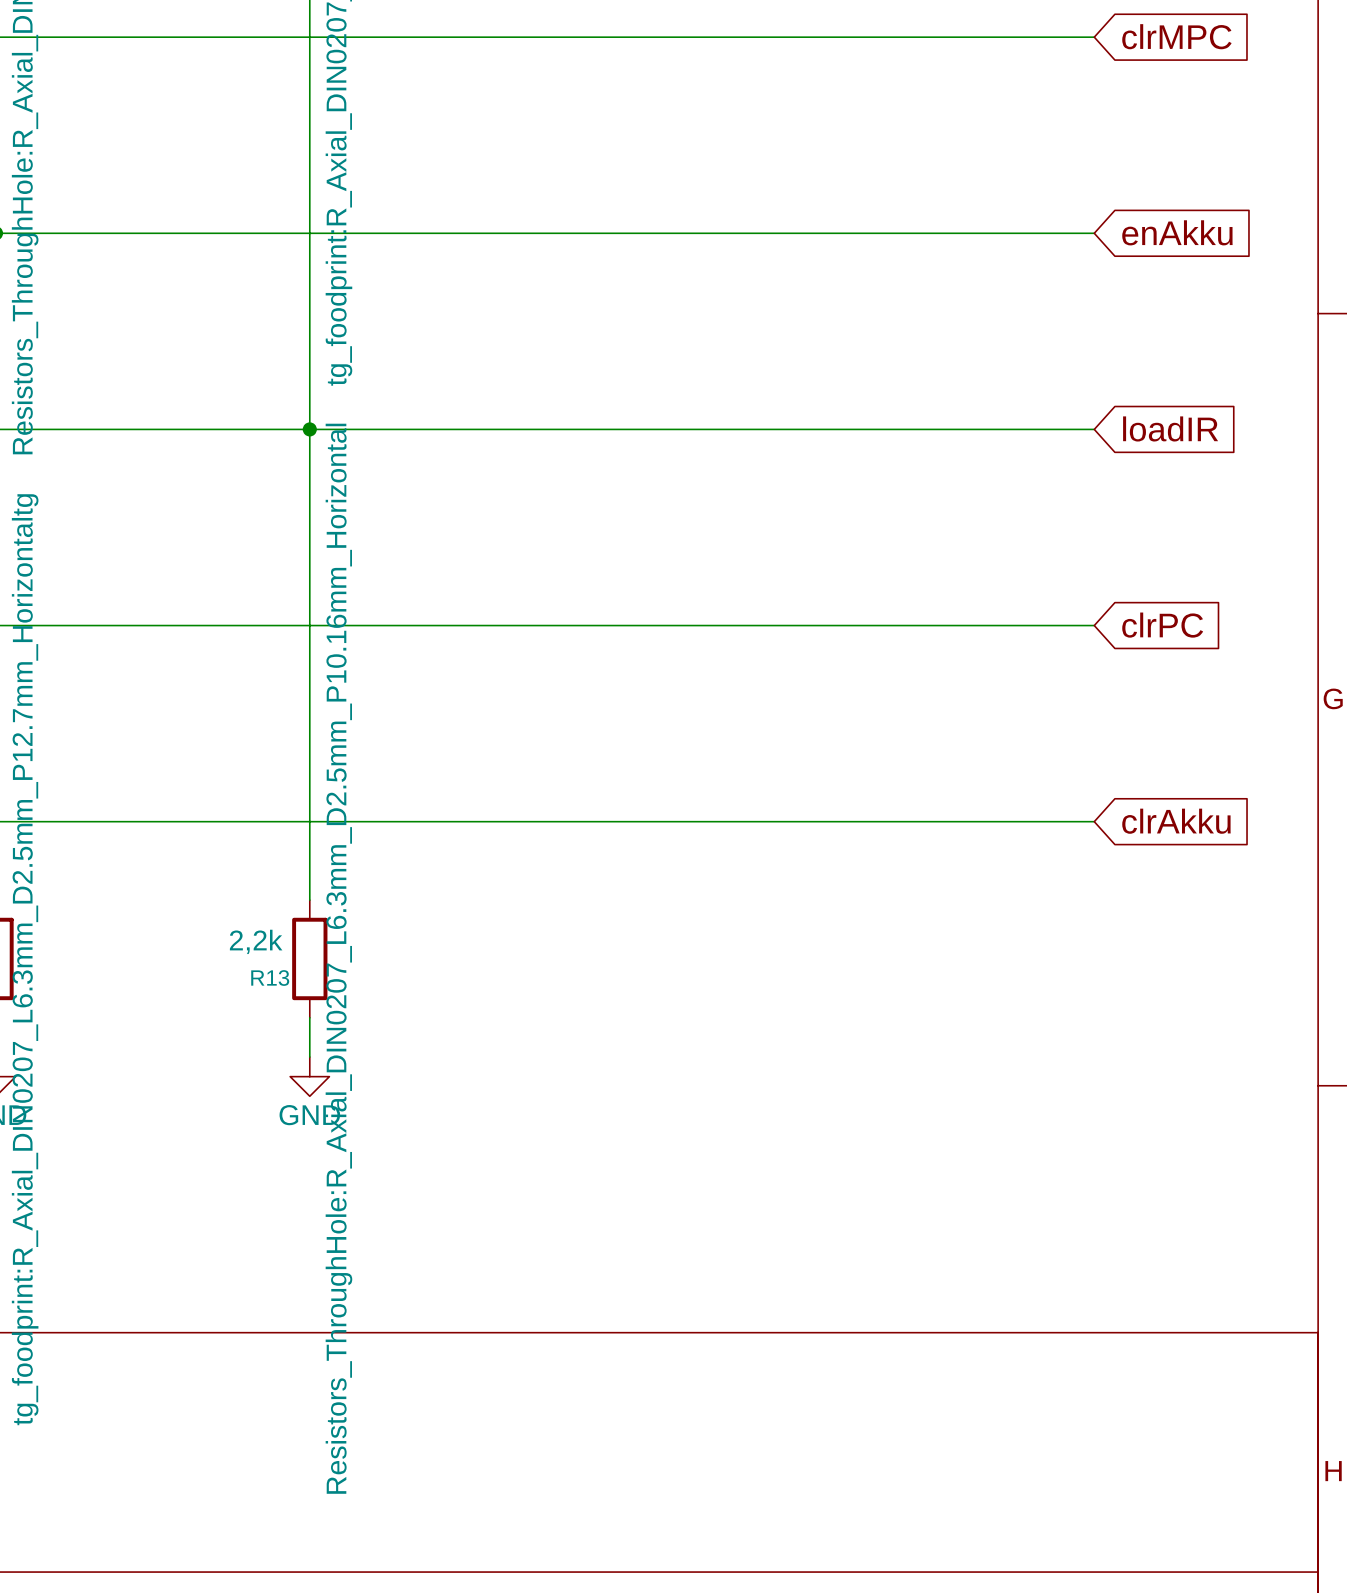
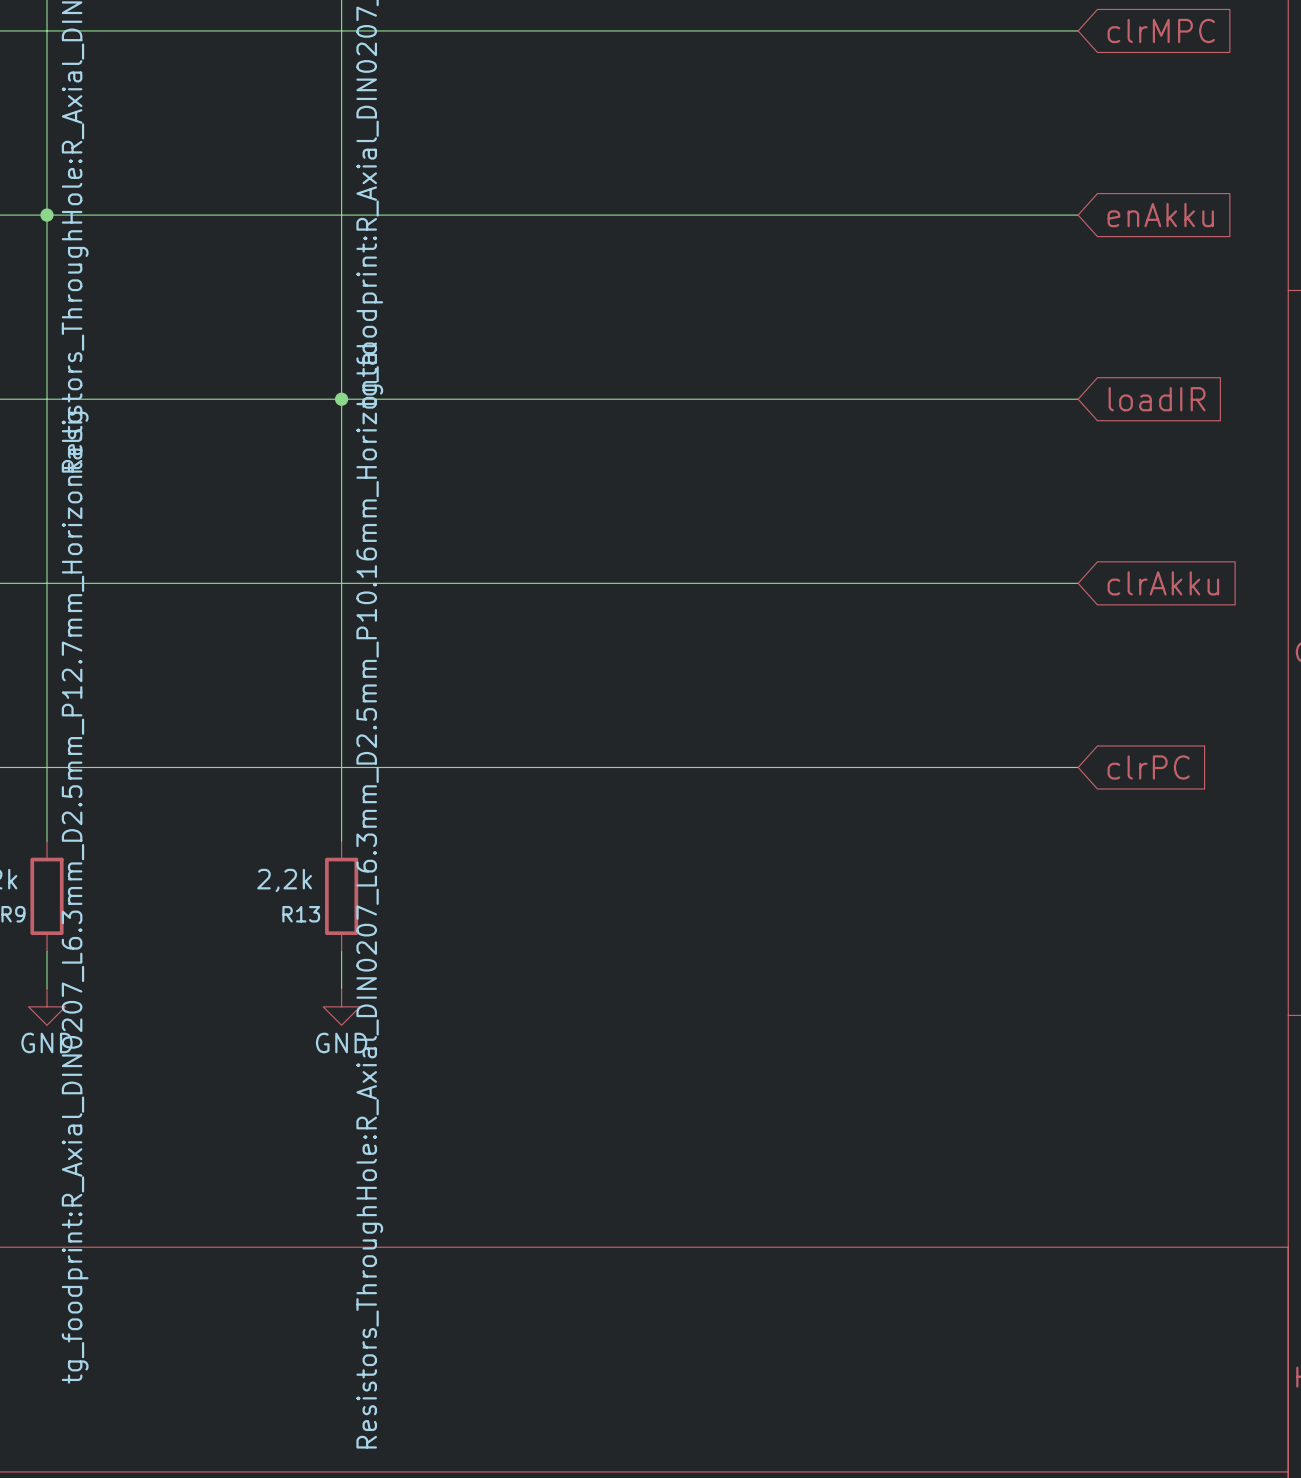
global label: clrPC (1162, 625) -> clrAkku (1163, 583)
global label: clrAkku (1176, 821) -> clrPC (1148, 767)

